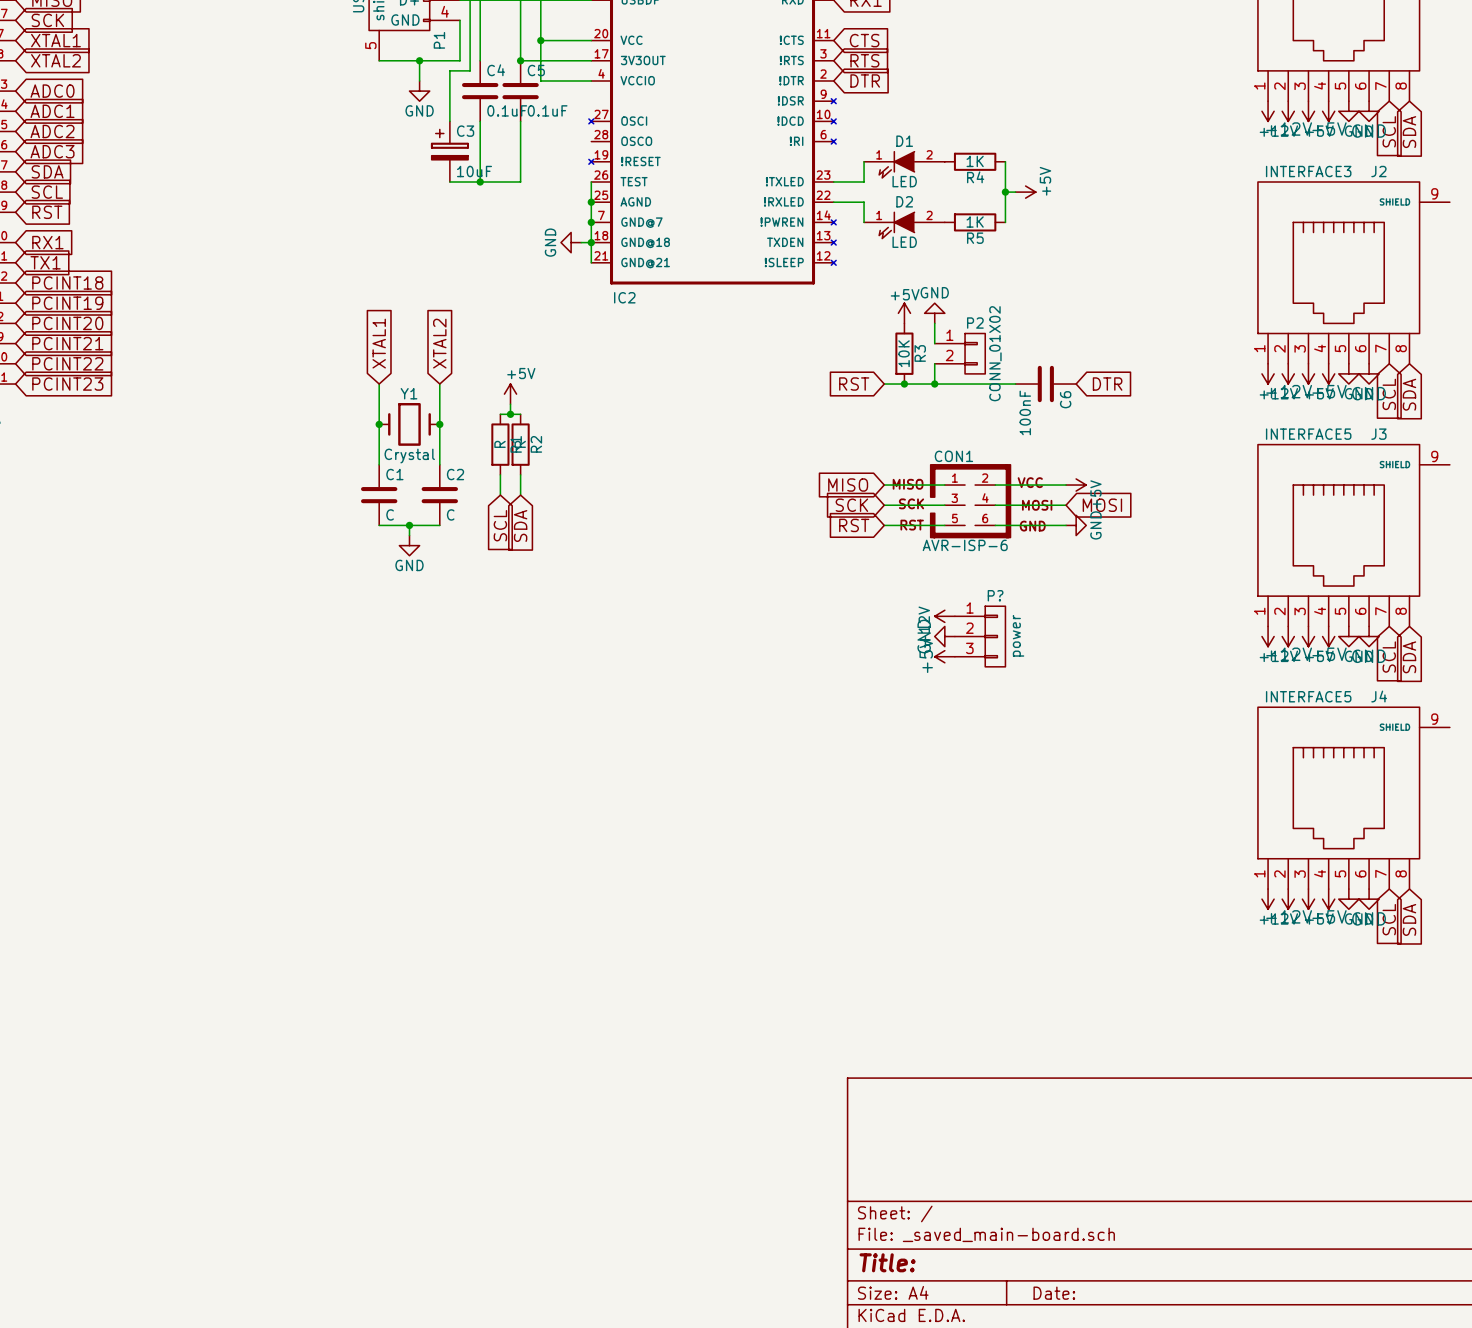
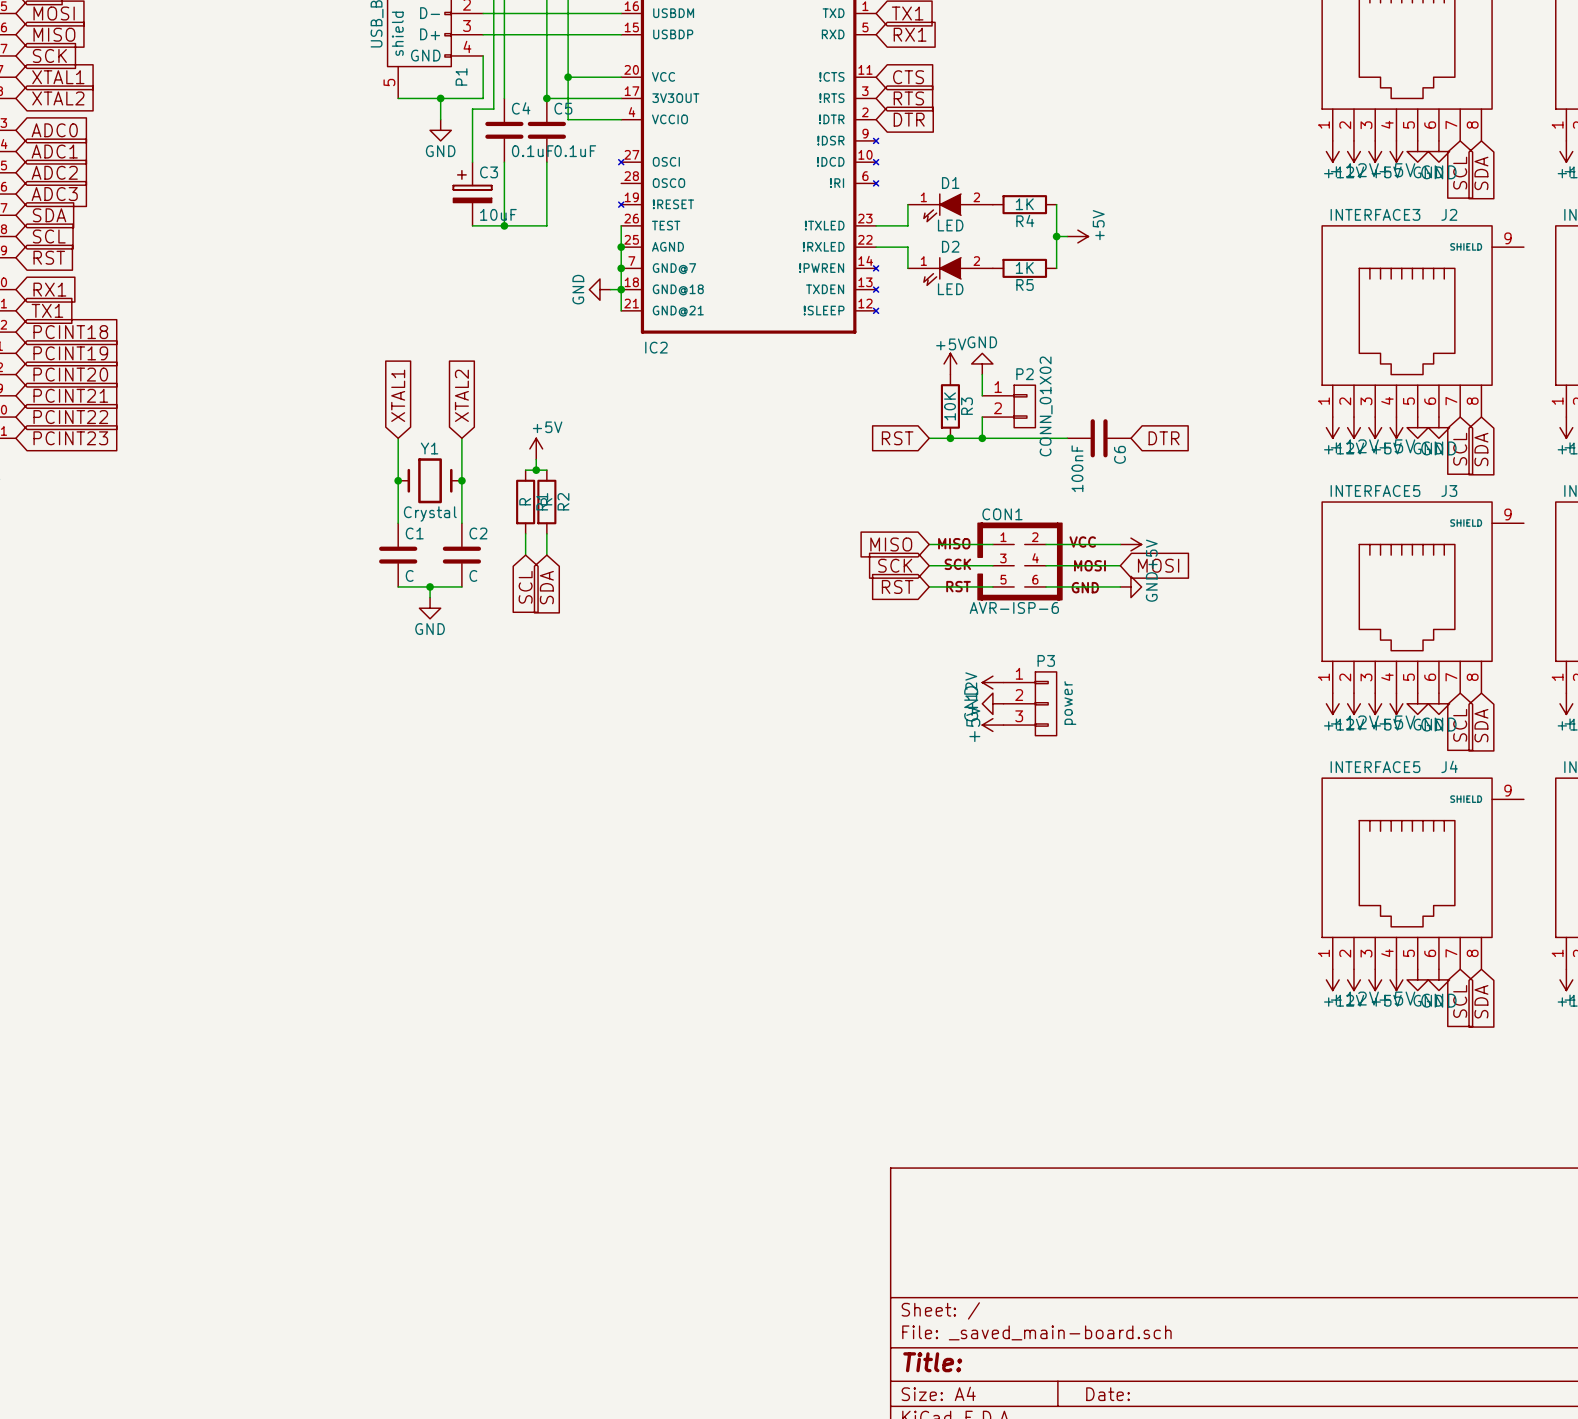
P? name: P? (995, 595) -> P3 (1046, 660)

